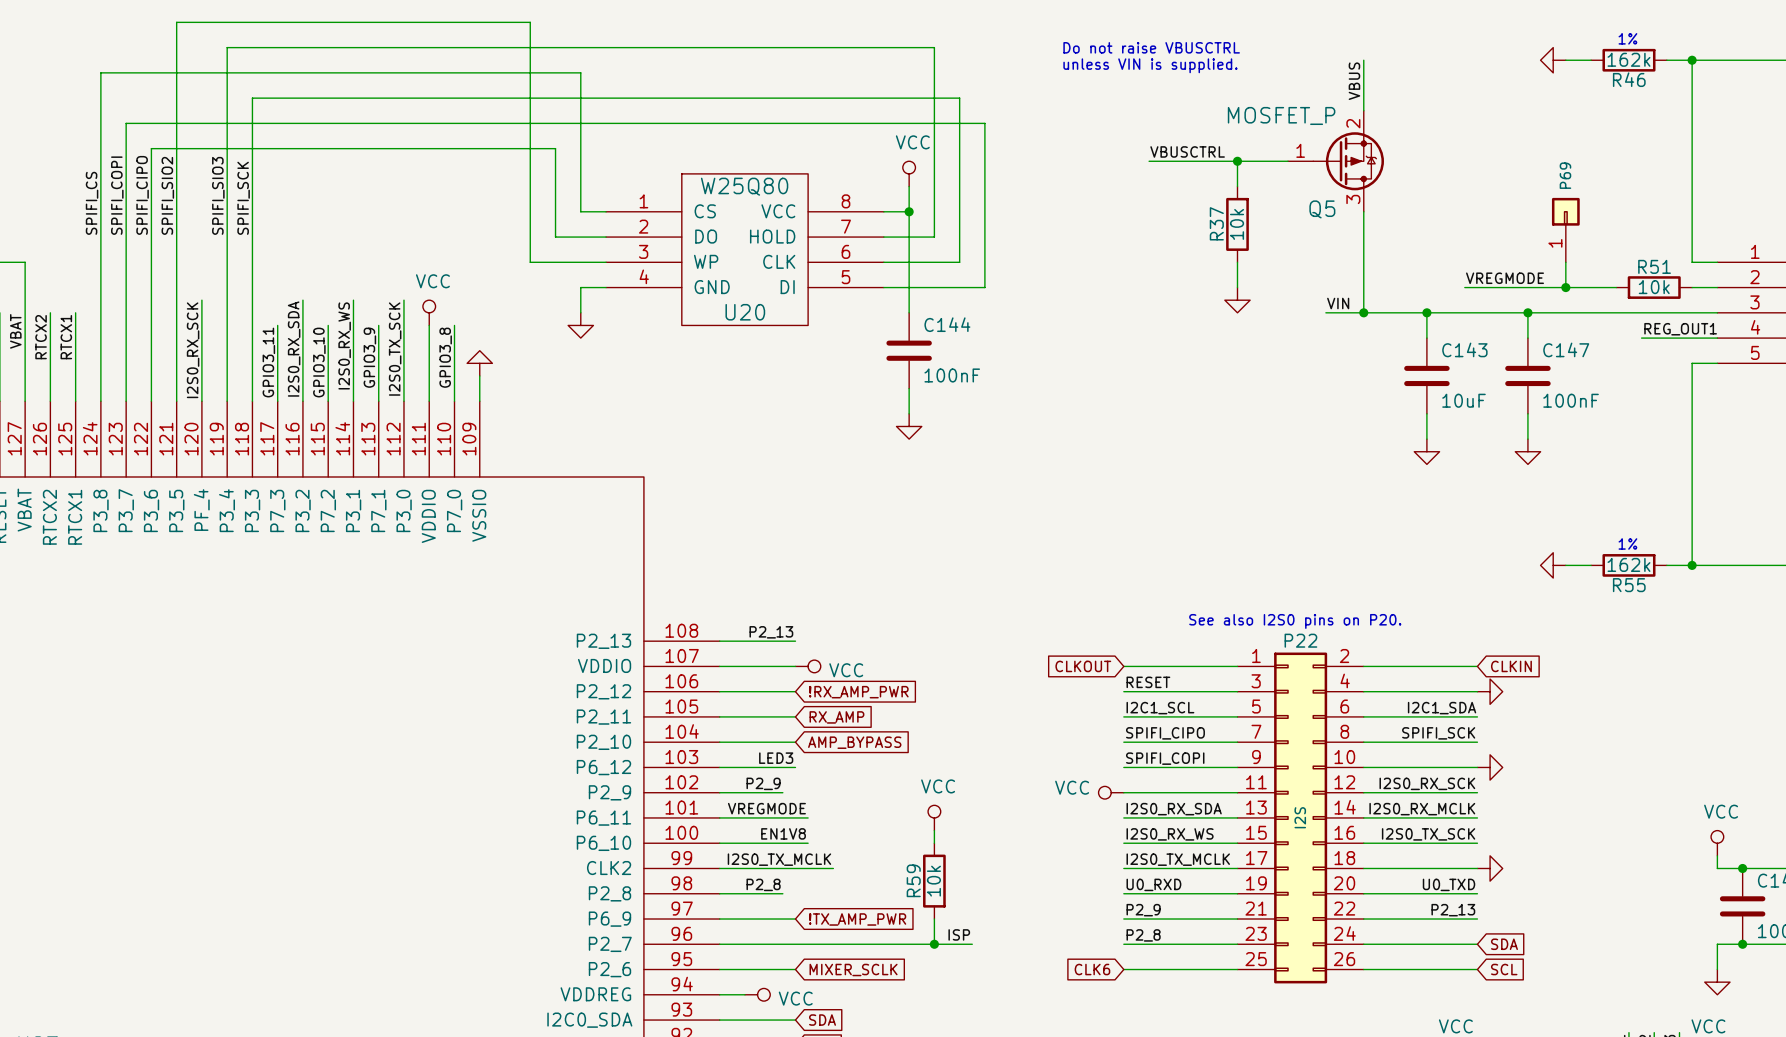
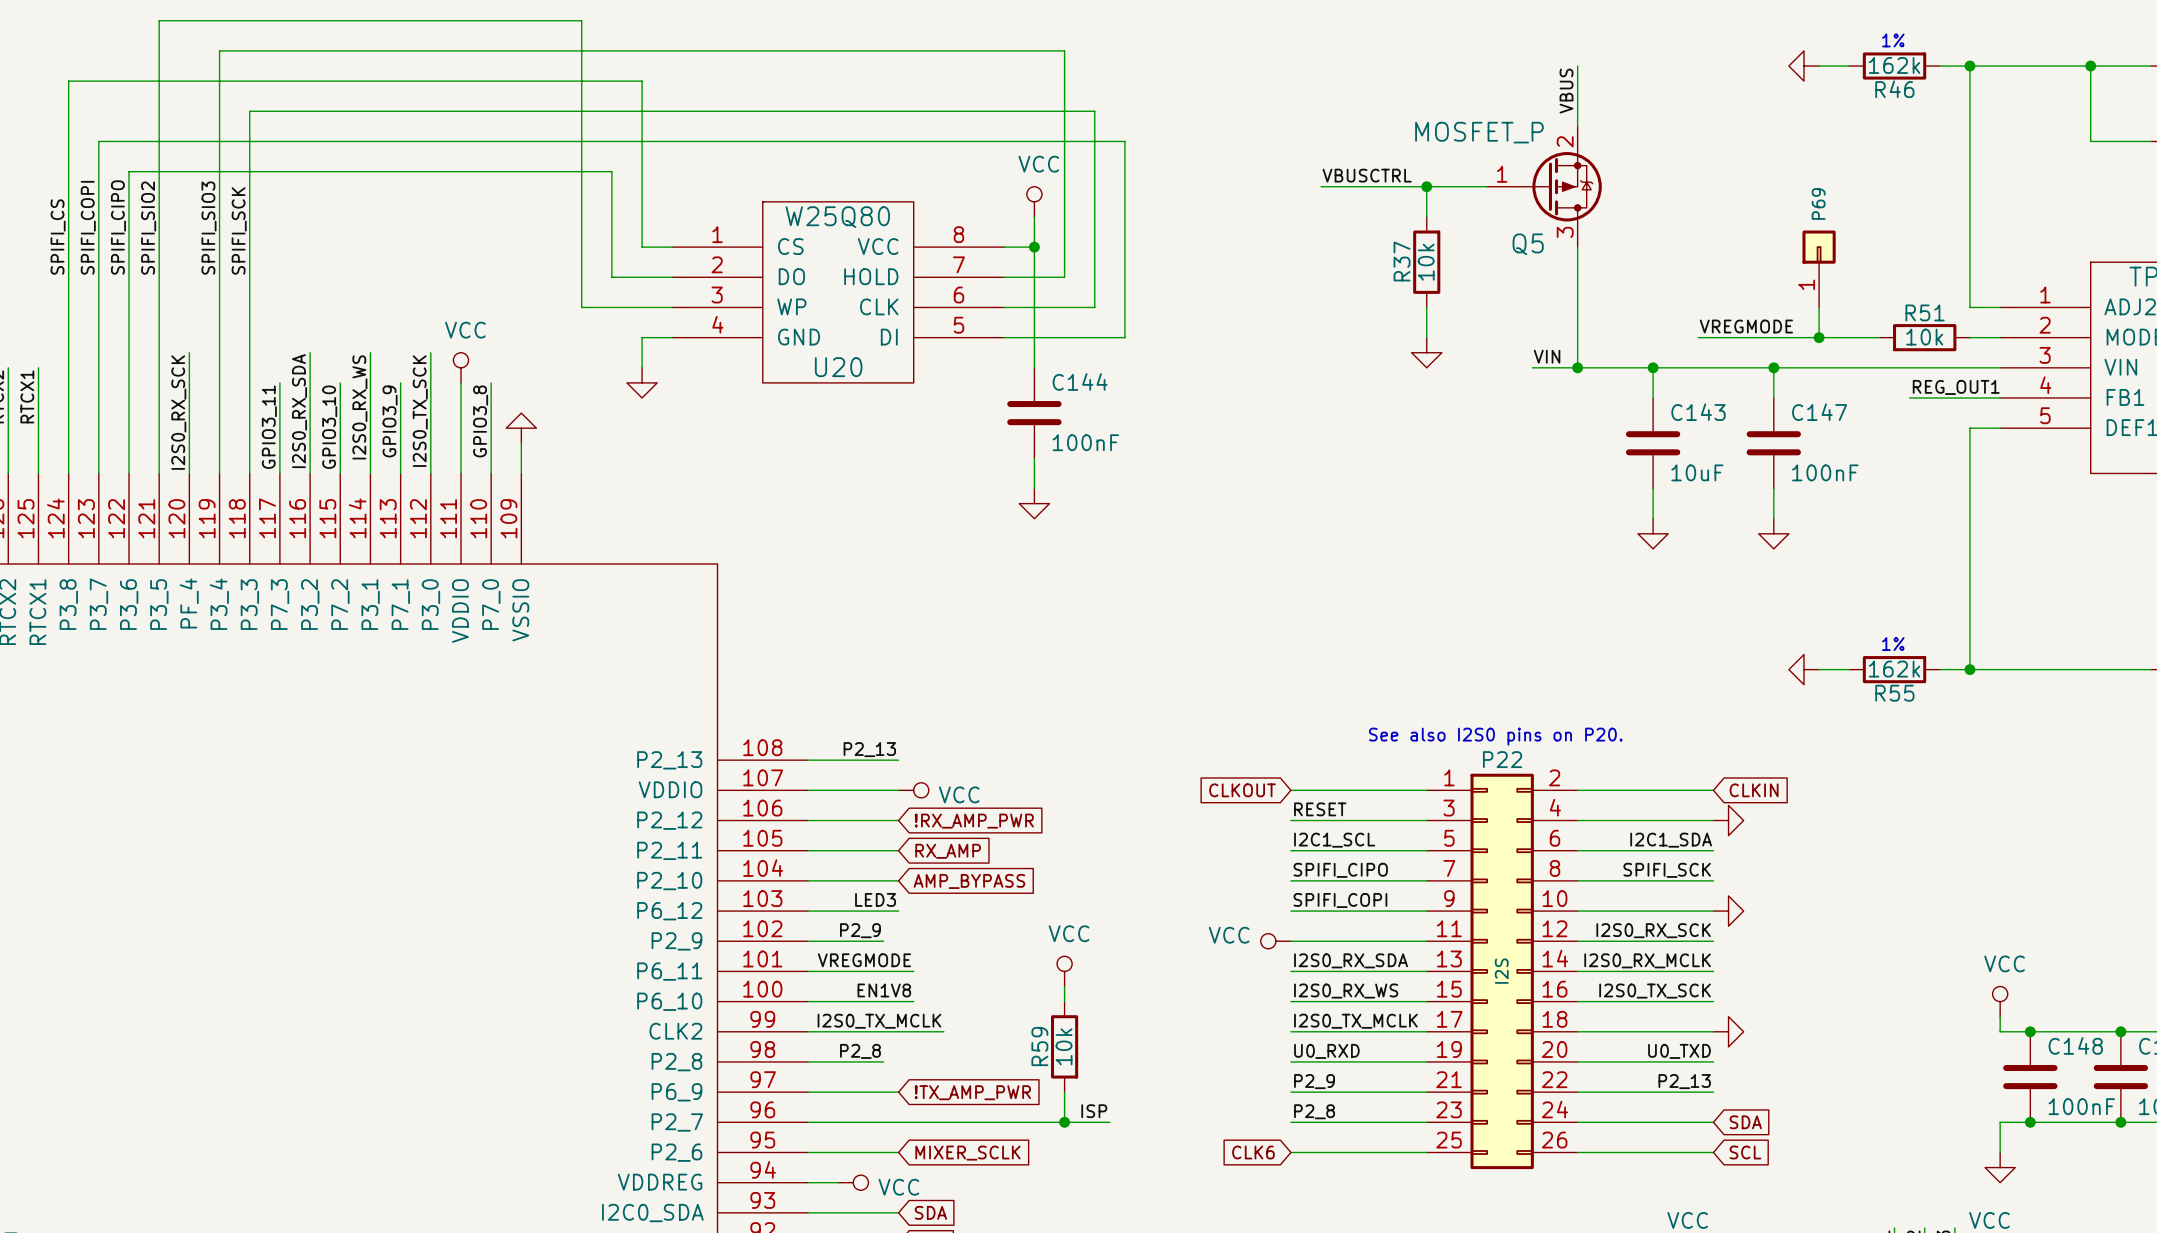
text: Do not raise VBUSCTRL (1151, 47) -> none
text: unless VIN is supplied. (1150, 65) -> none

